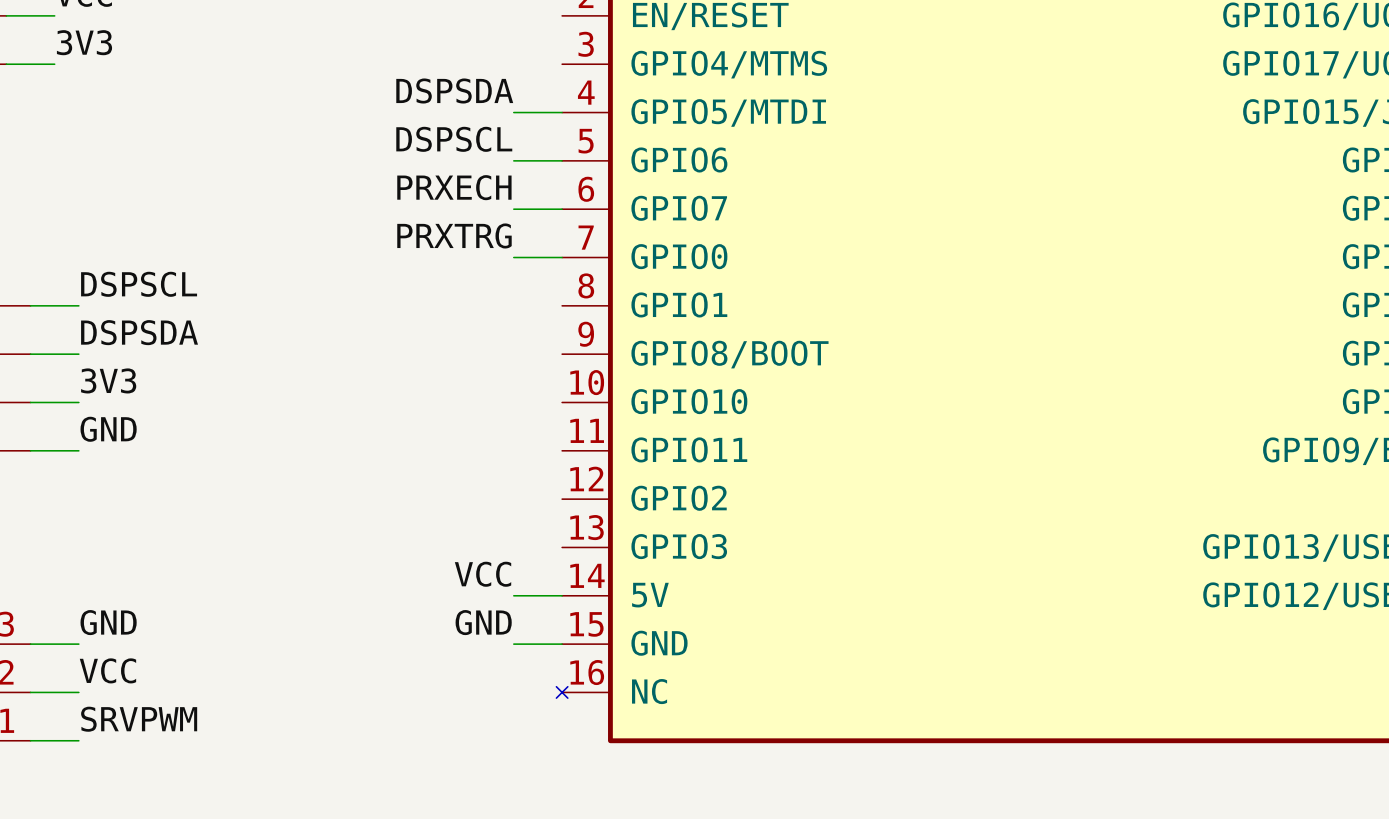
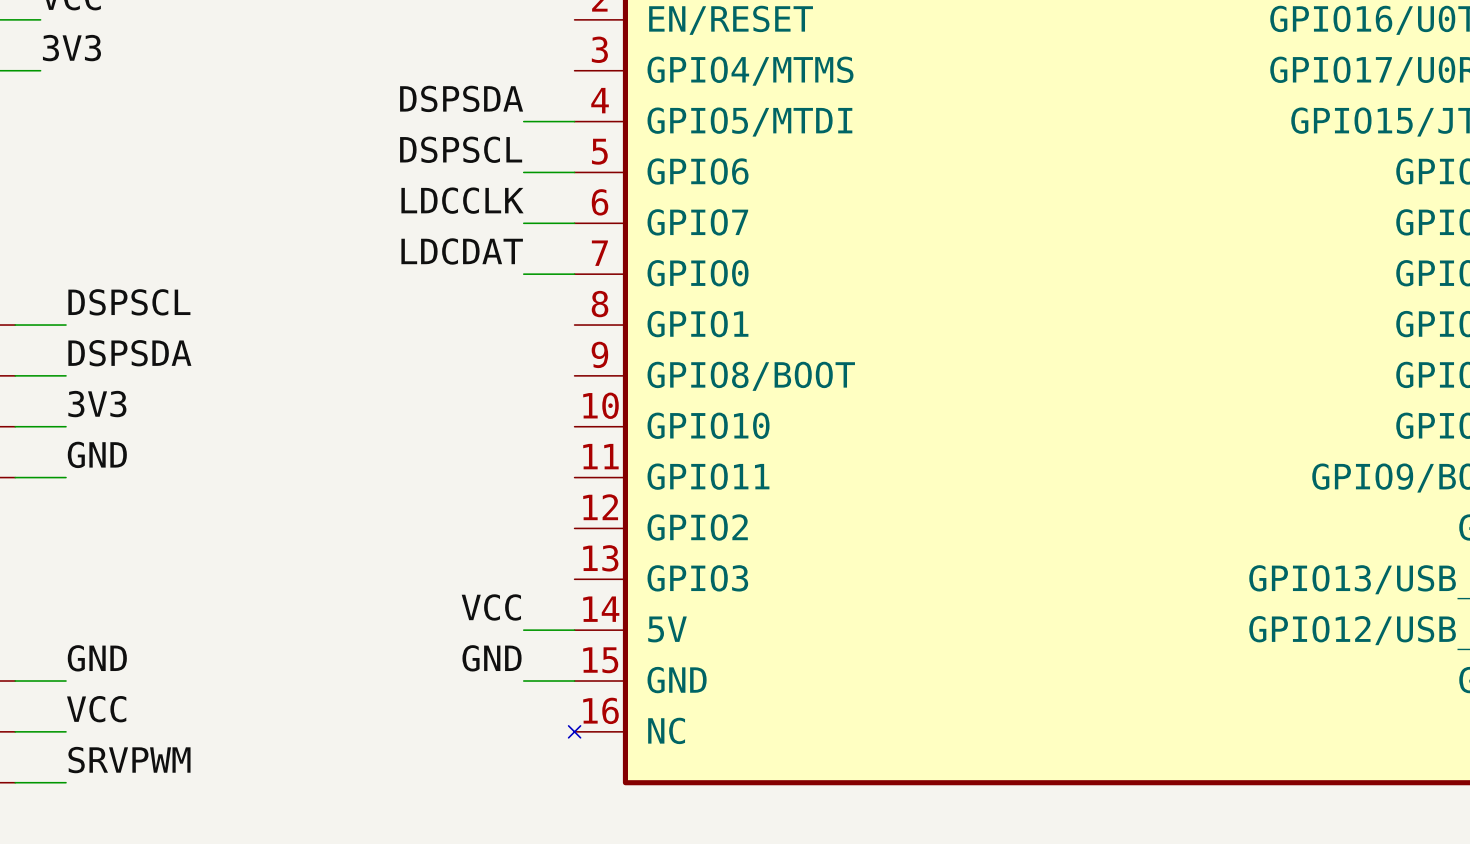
label: PRXECH (454, 187) -> LDCCLK (462, 200)
label: PRXTRG (454, 235) -> LDCDAT (462, 251)

